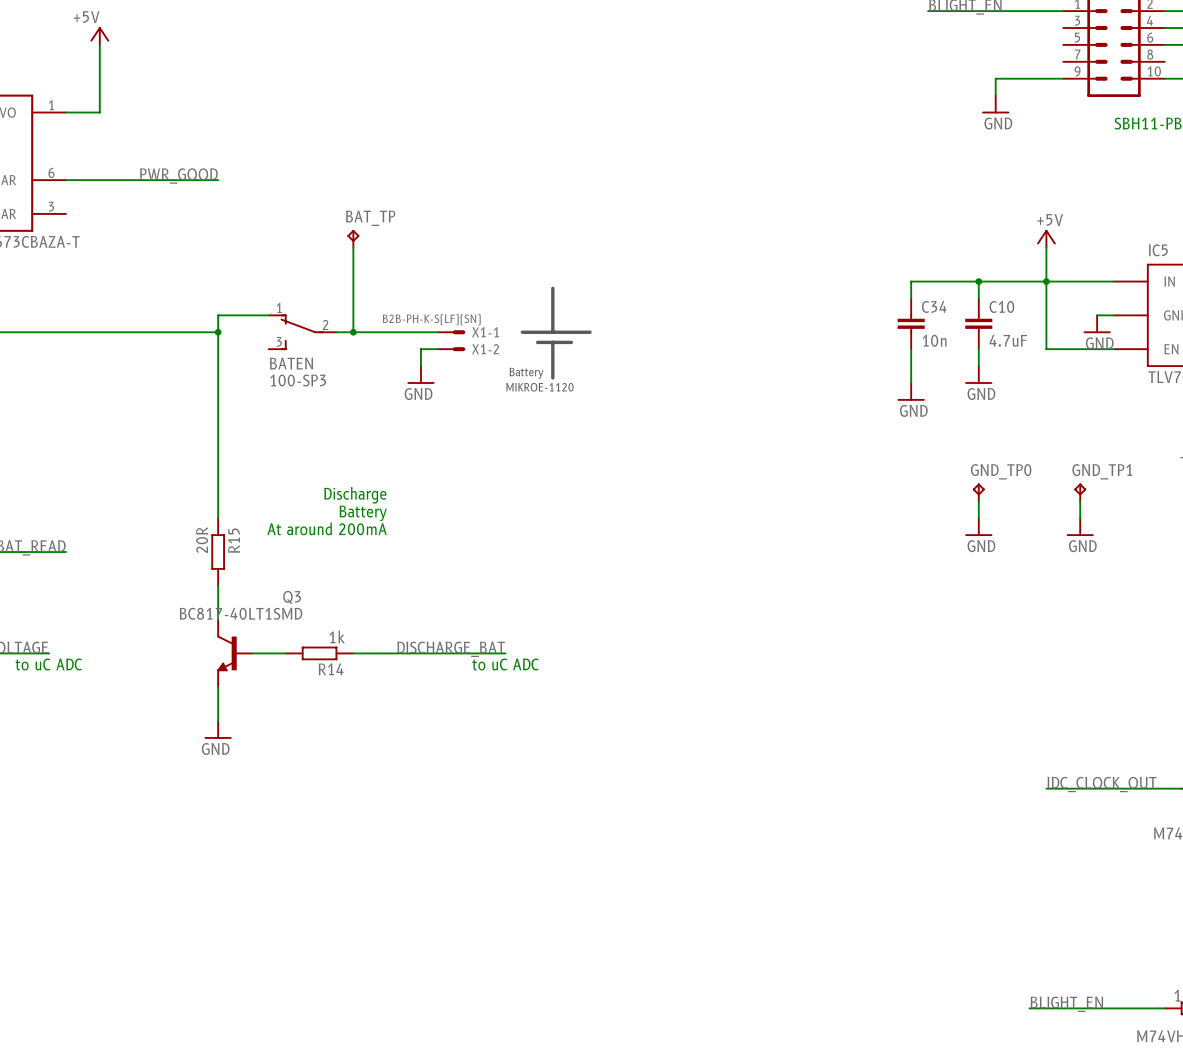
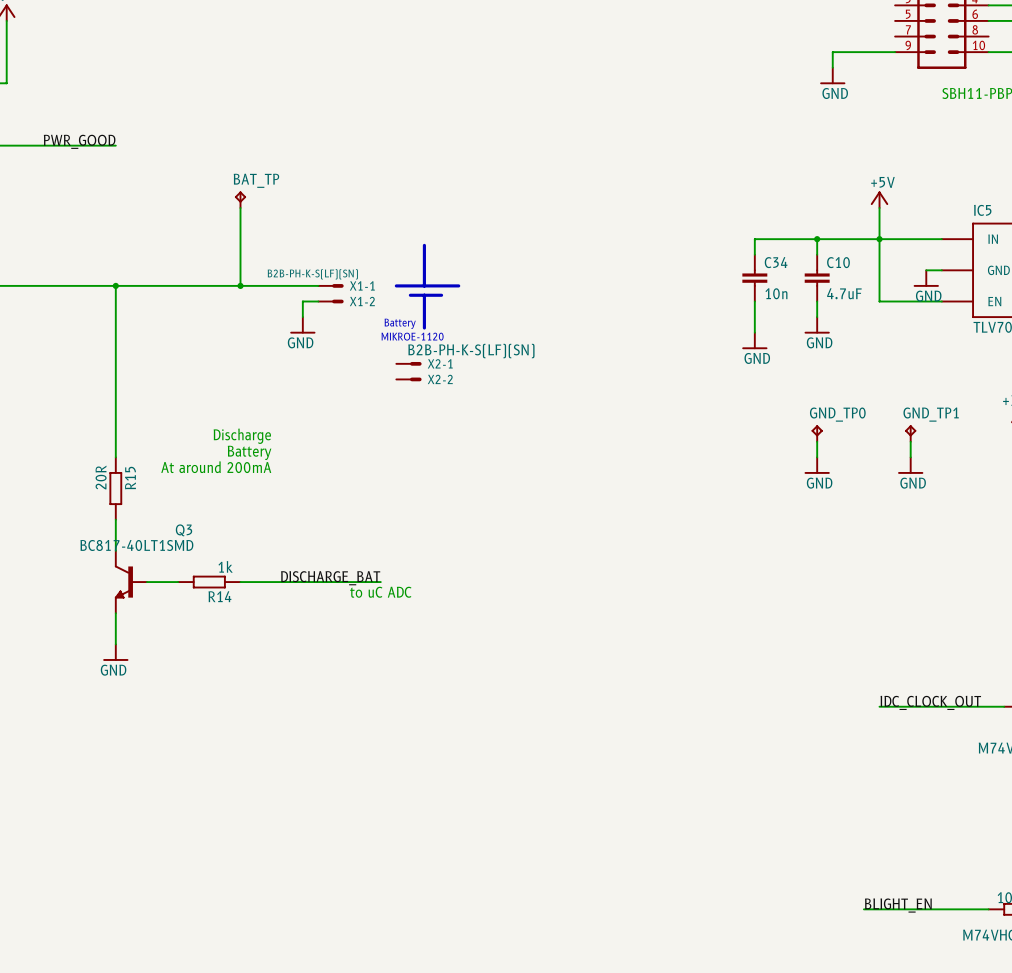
wire: (268, 315) (218, 315) (218, 332) -> (224, 285) (115, 285)
BATEN: 100-SP3 (302, 332) -> none
X2-1: none -> B2B-PH-K-S(LF)(SN) (408, 363)
X2-2: none -> (408, 379)

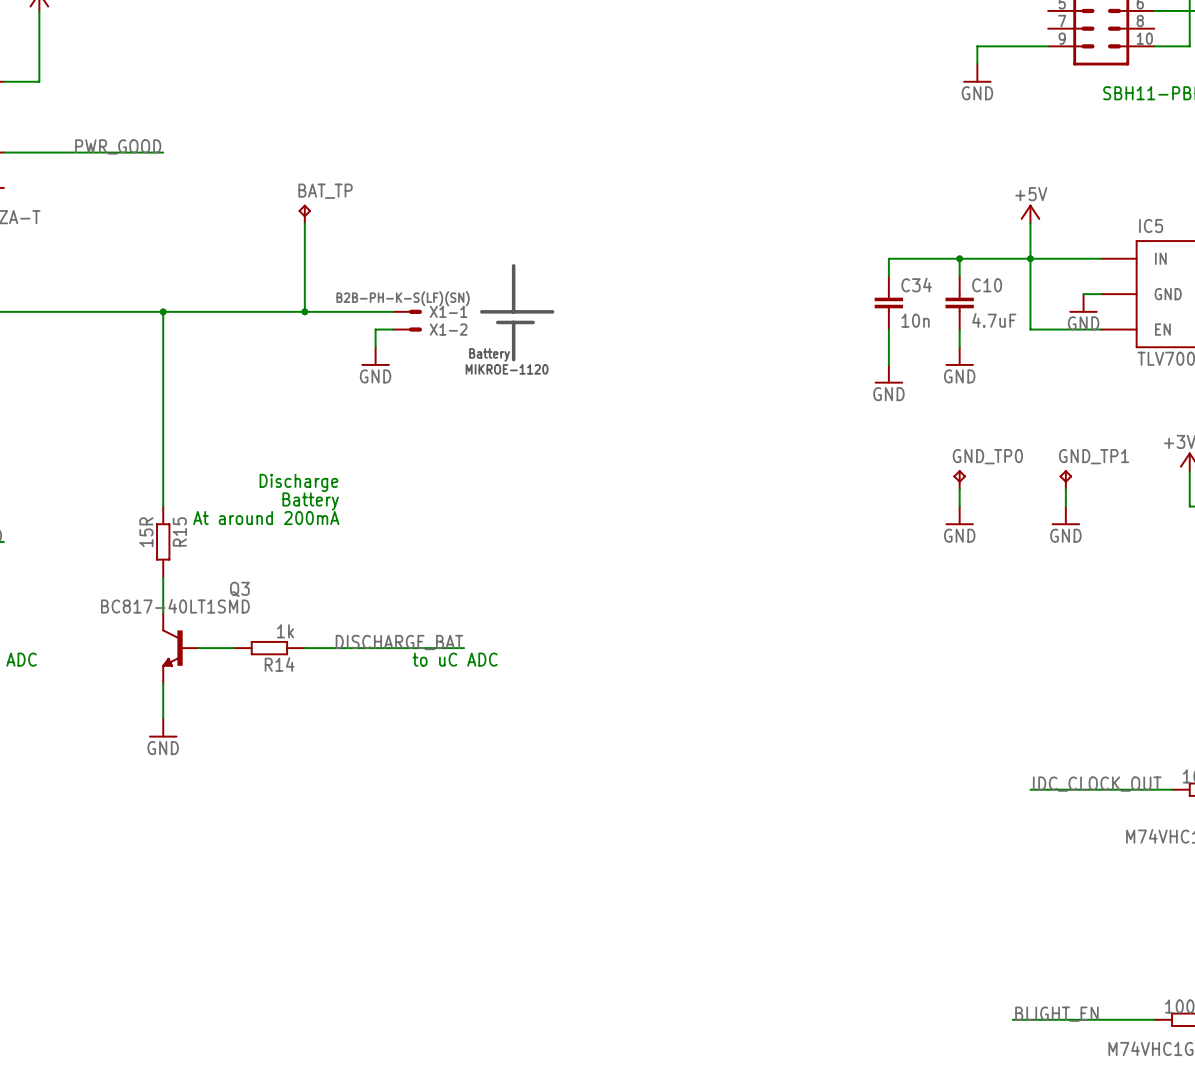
X2-1: B2B-PH-K-S(LF)(SN) (408, 363) -> none
X2-2: (408, 379) -> none
R15 value: 20R (101, 477) -> 15R (146, 532)

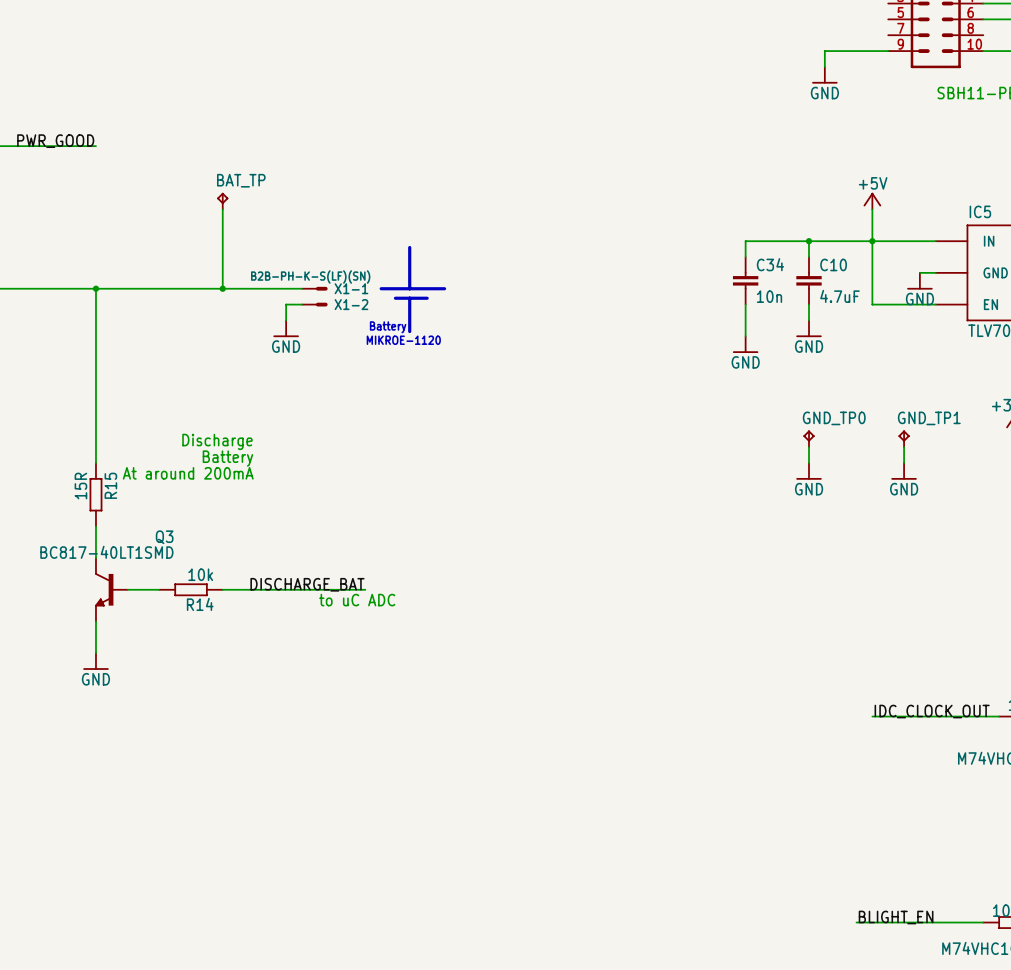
R14 value: 1k (285, 631) -> 10k (200, 574)

